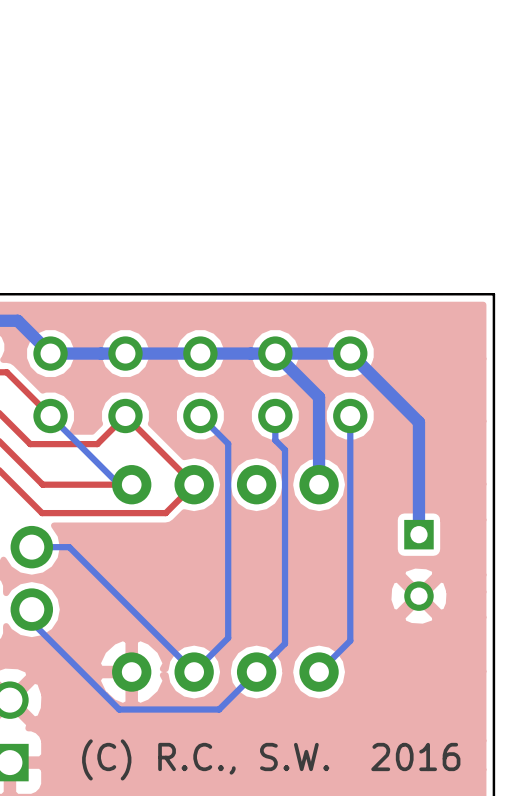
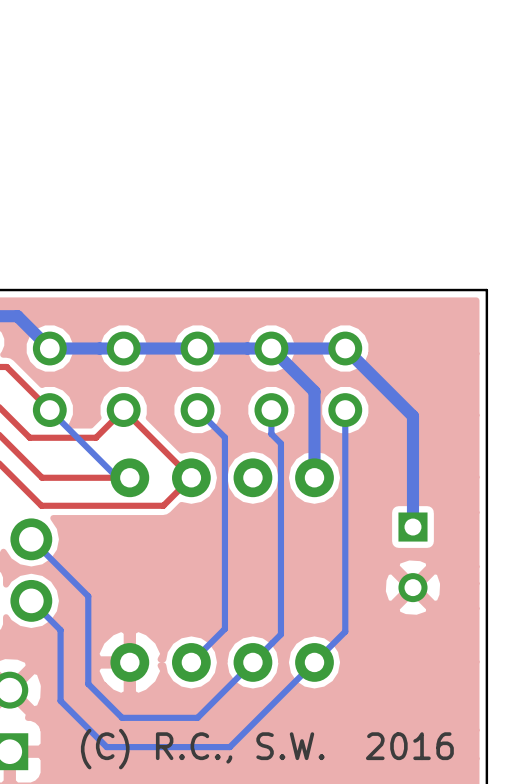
bottom track: (31, 547) (69, 547) (194, 672) -> (31, 539) (88, 596) (88, 683) (122, 717) (197, 717) (216, 699)
bottom track: none -> (43, 600) (43, 612) (60, 630) (60, 700) (106, 747) (229, 747) (314, 662)
bottom track: (31, 622) (119, 709) (219, 709) -> none

